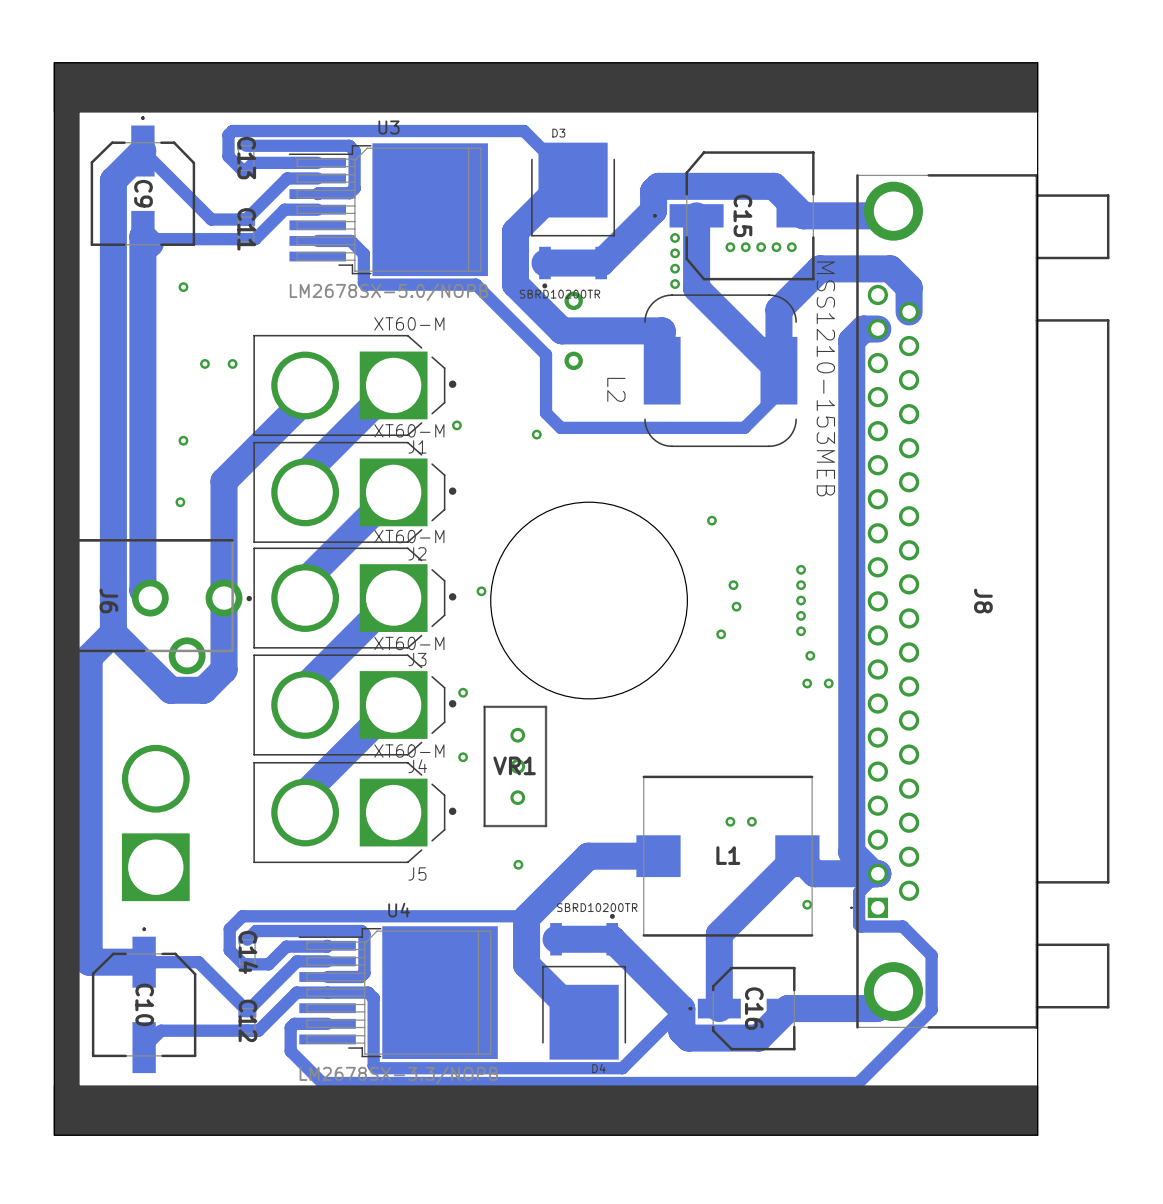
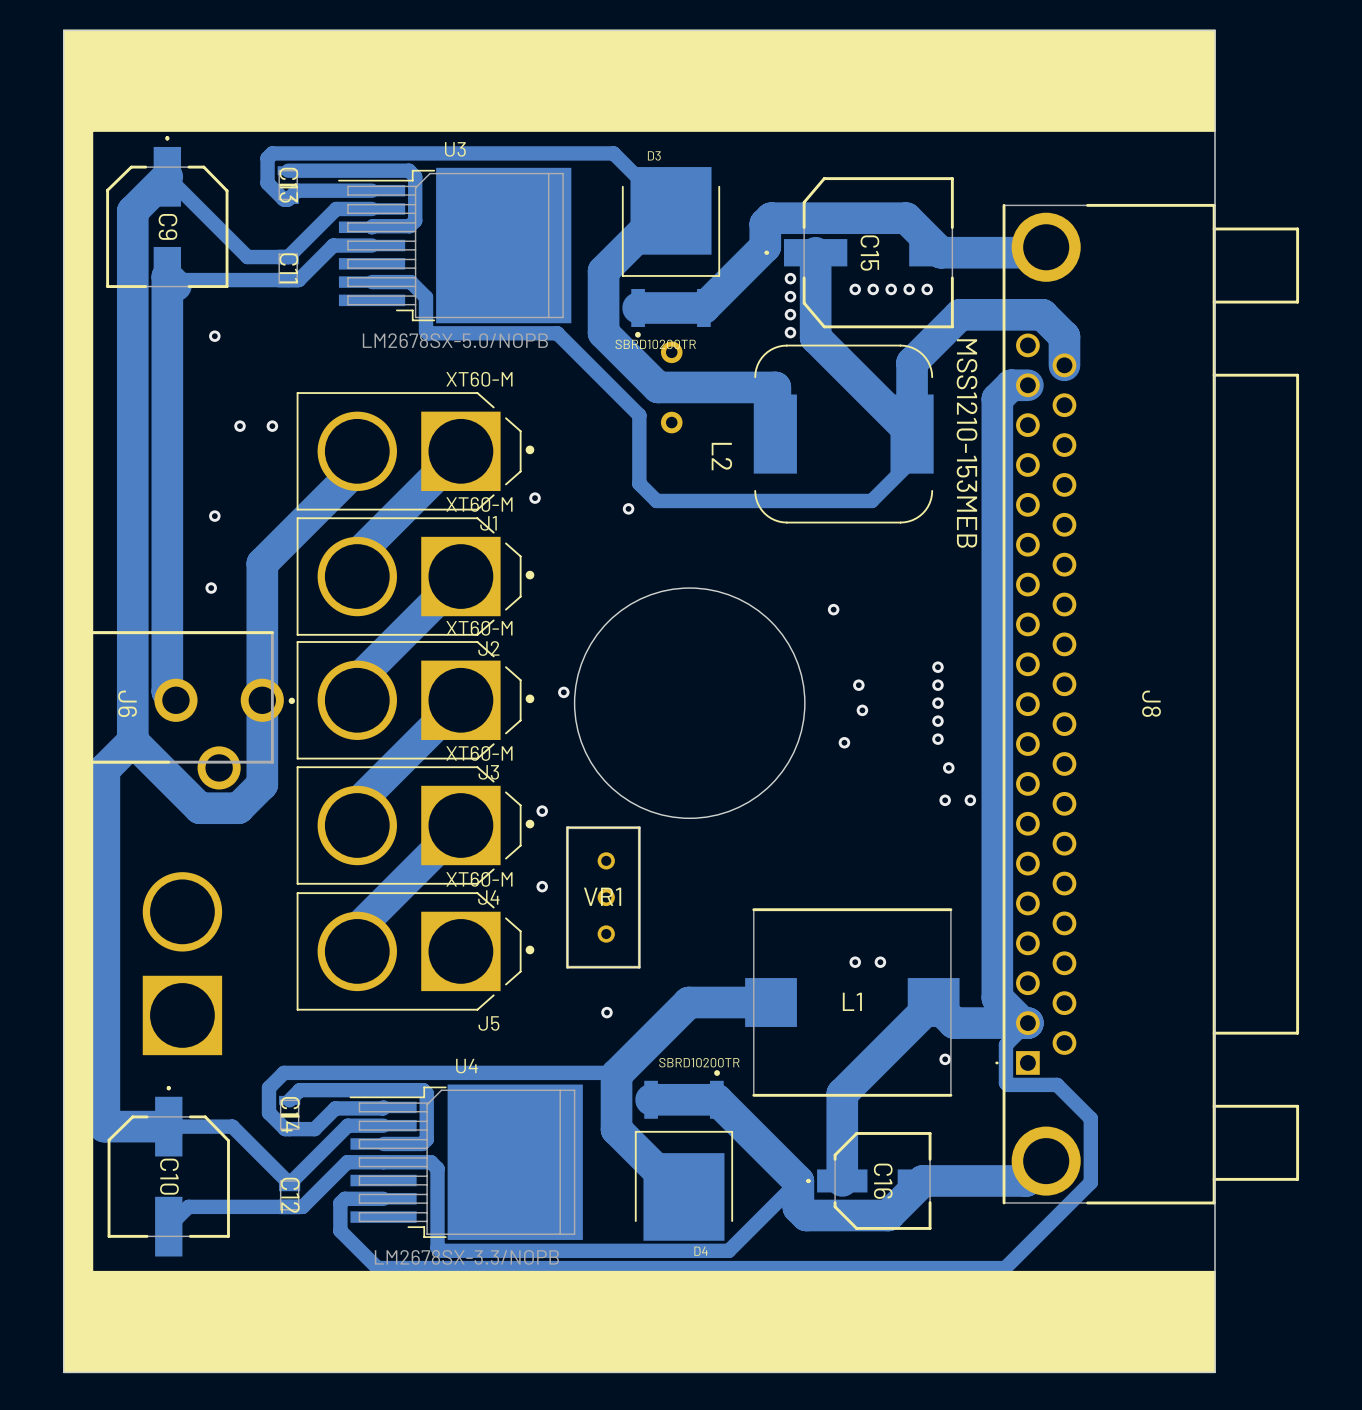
drawing: none -> [62, 29, 1216, 132]
drawing: [53, 62, 1039, 113] -> none
board edge: (1037, 62) (54, 62) -> (1215, 73) (1215, 30) (63, 30) (63, 73)
drawing: [53, 1085, 1039, 1136] -> none
drawing: none -> [62, 1270, 1216, 1374]
board edge: (1037, 1135) (54, 1135) -> (1215, 1329) (1215, 1372) (63, 1372) (63, 1329)

